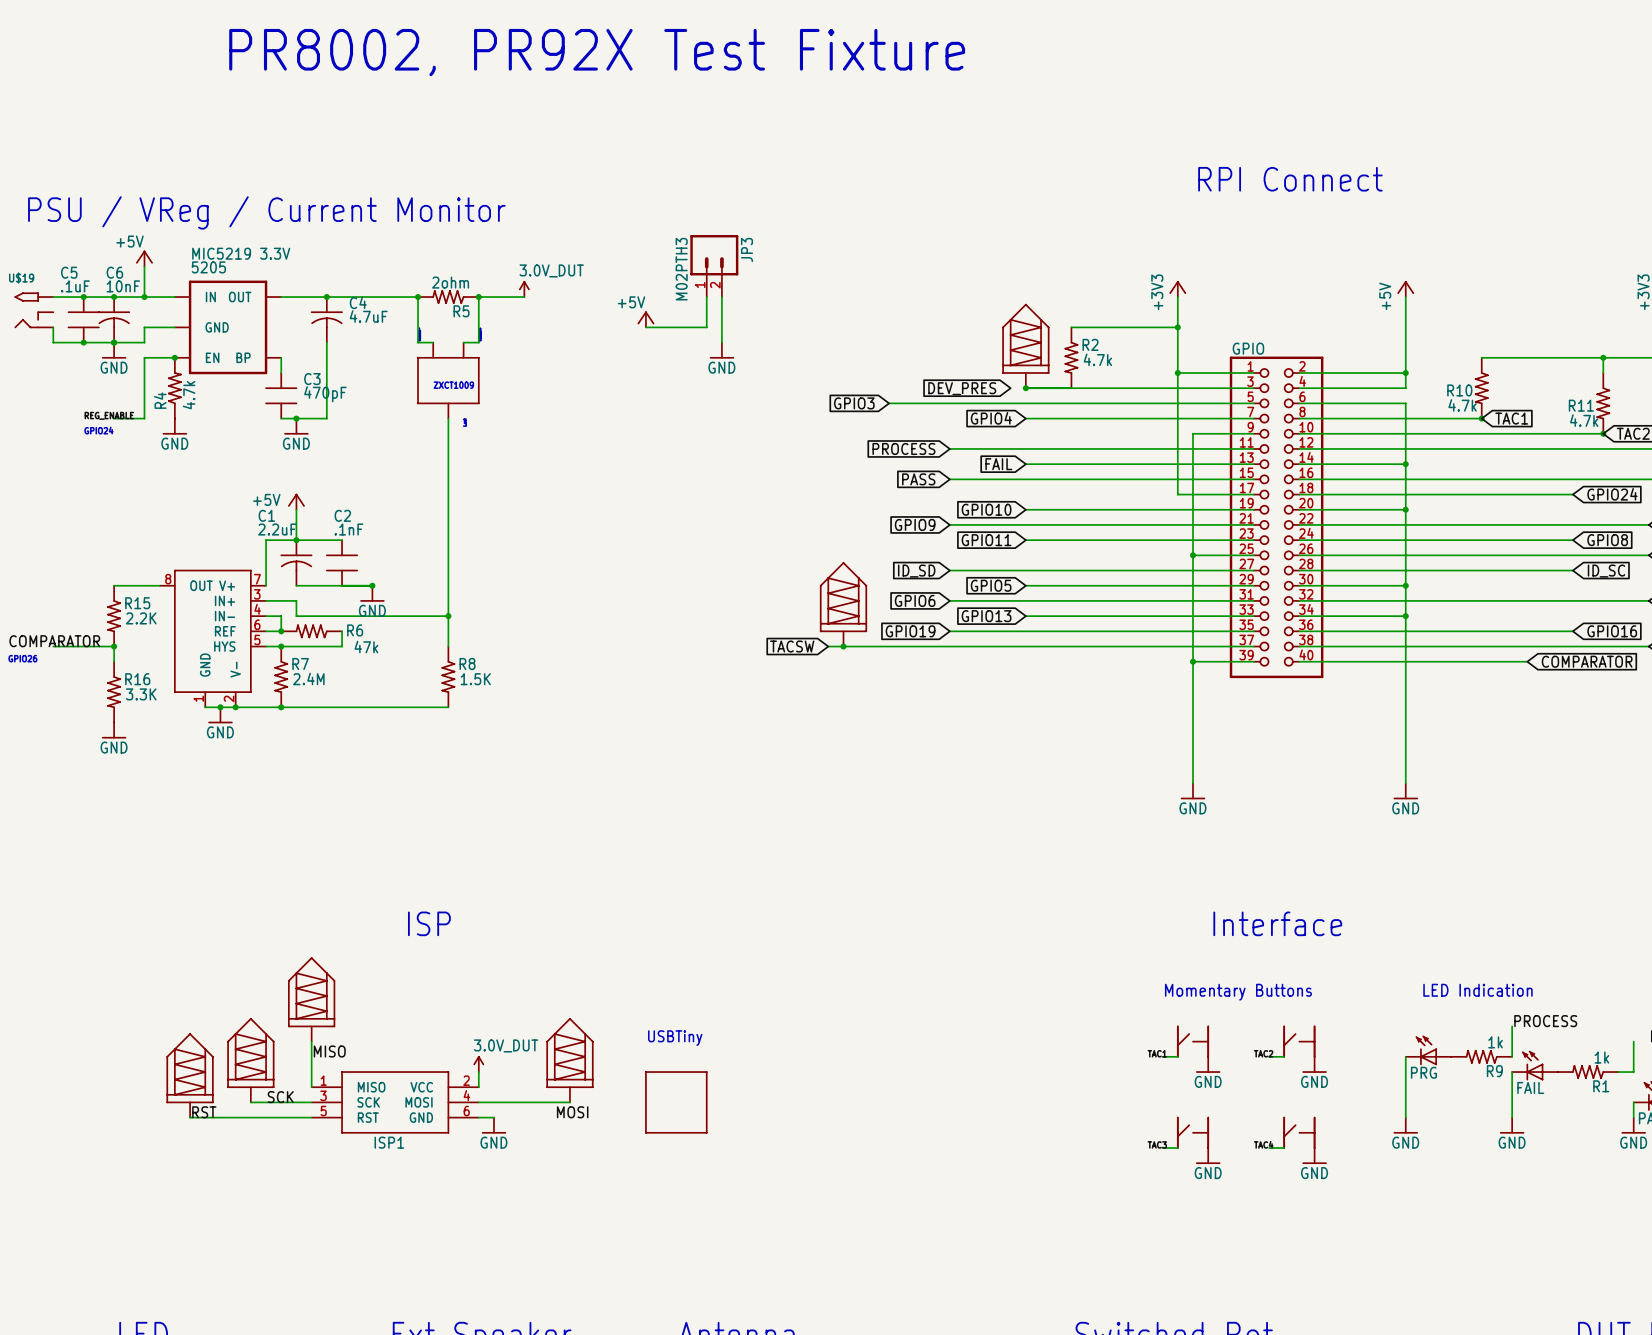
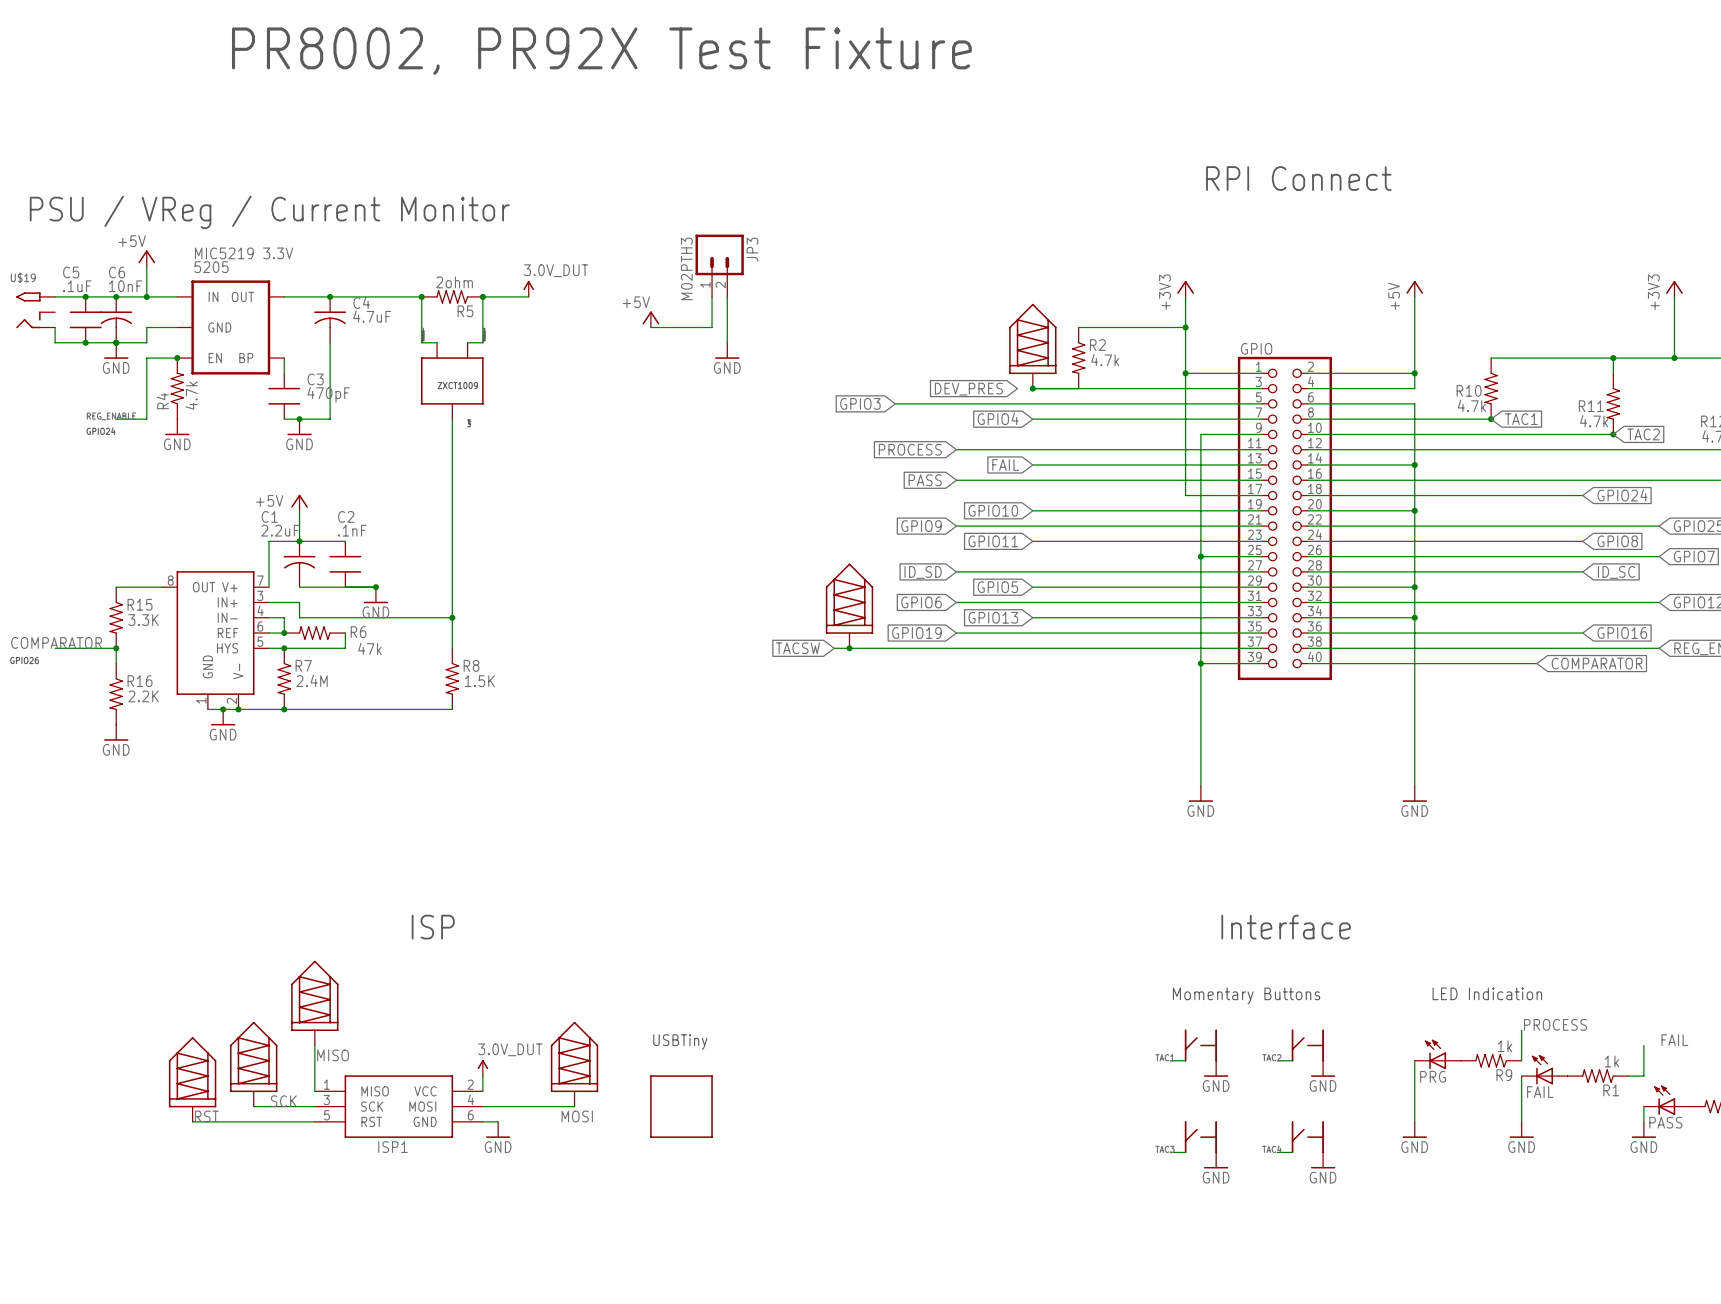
R15 value: 2.2K (141, 618) -> 3.3K (143, 620)
R16 value: 3.3K (141, 694) -> 2.2K (143, 696)

